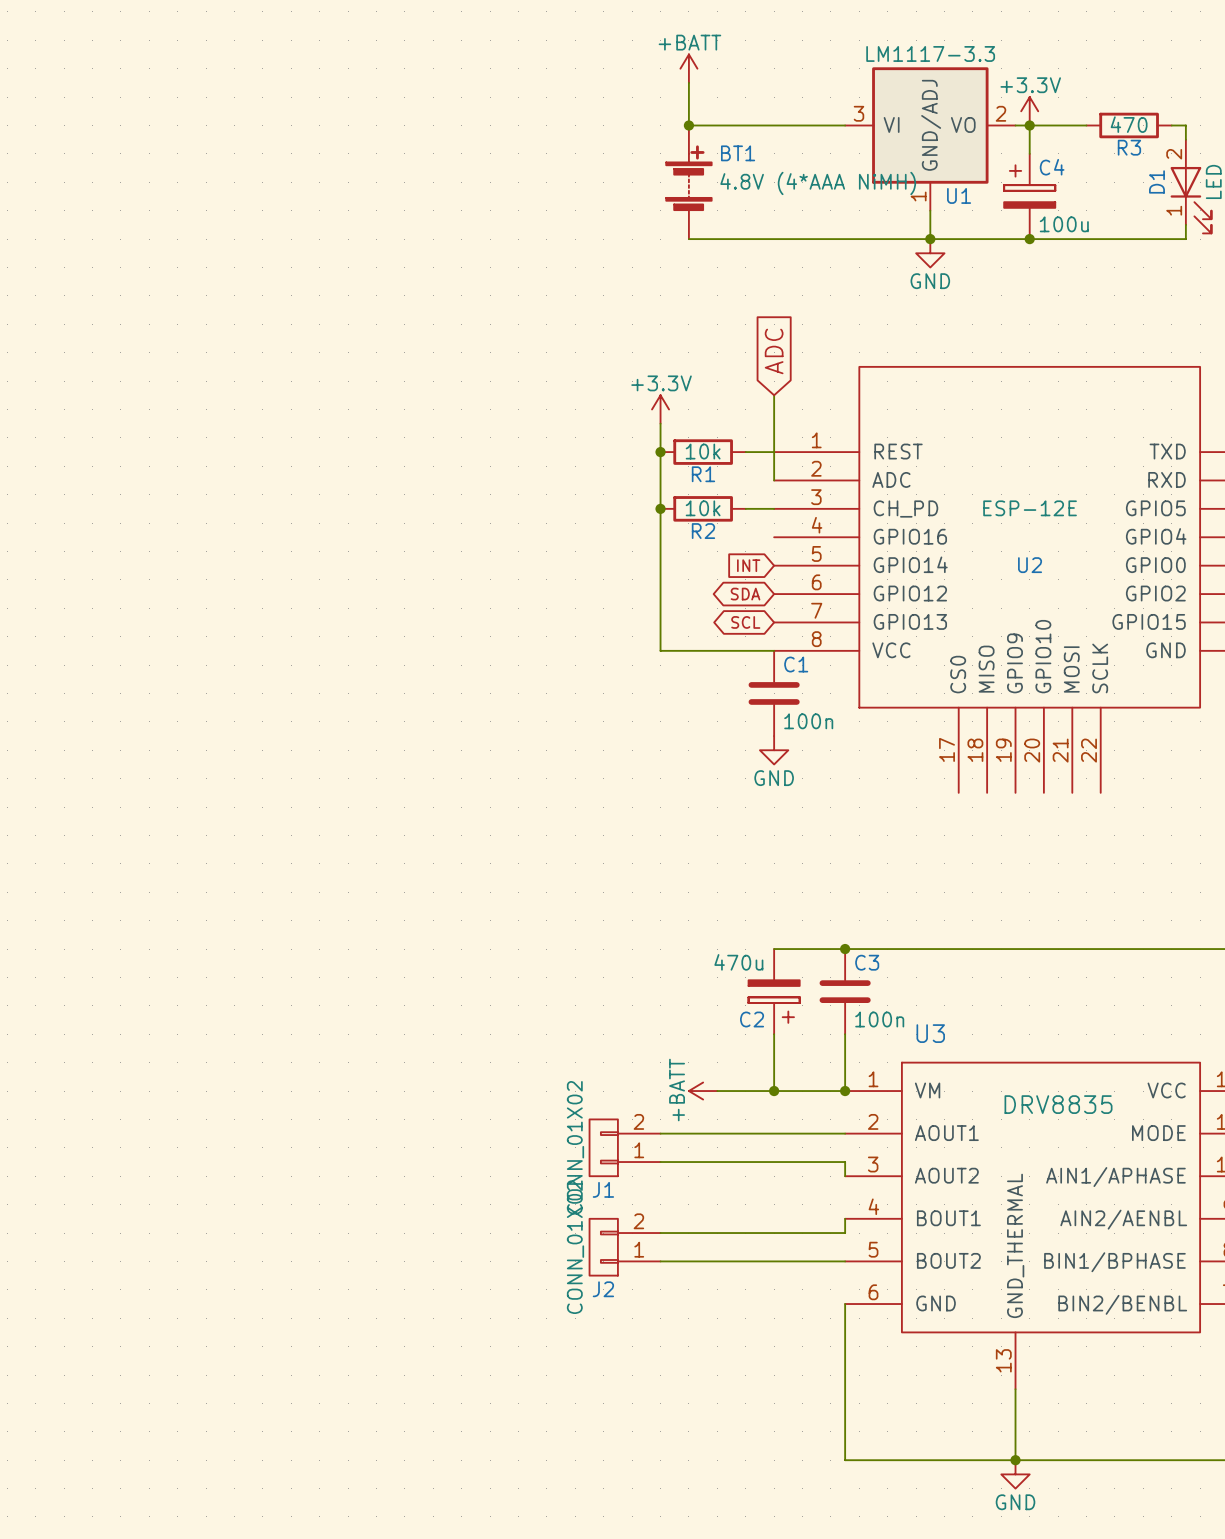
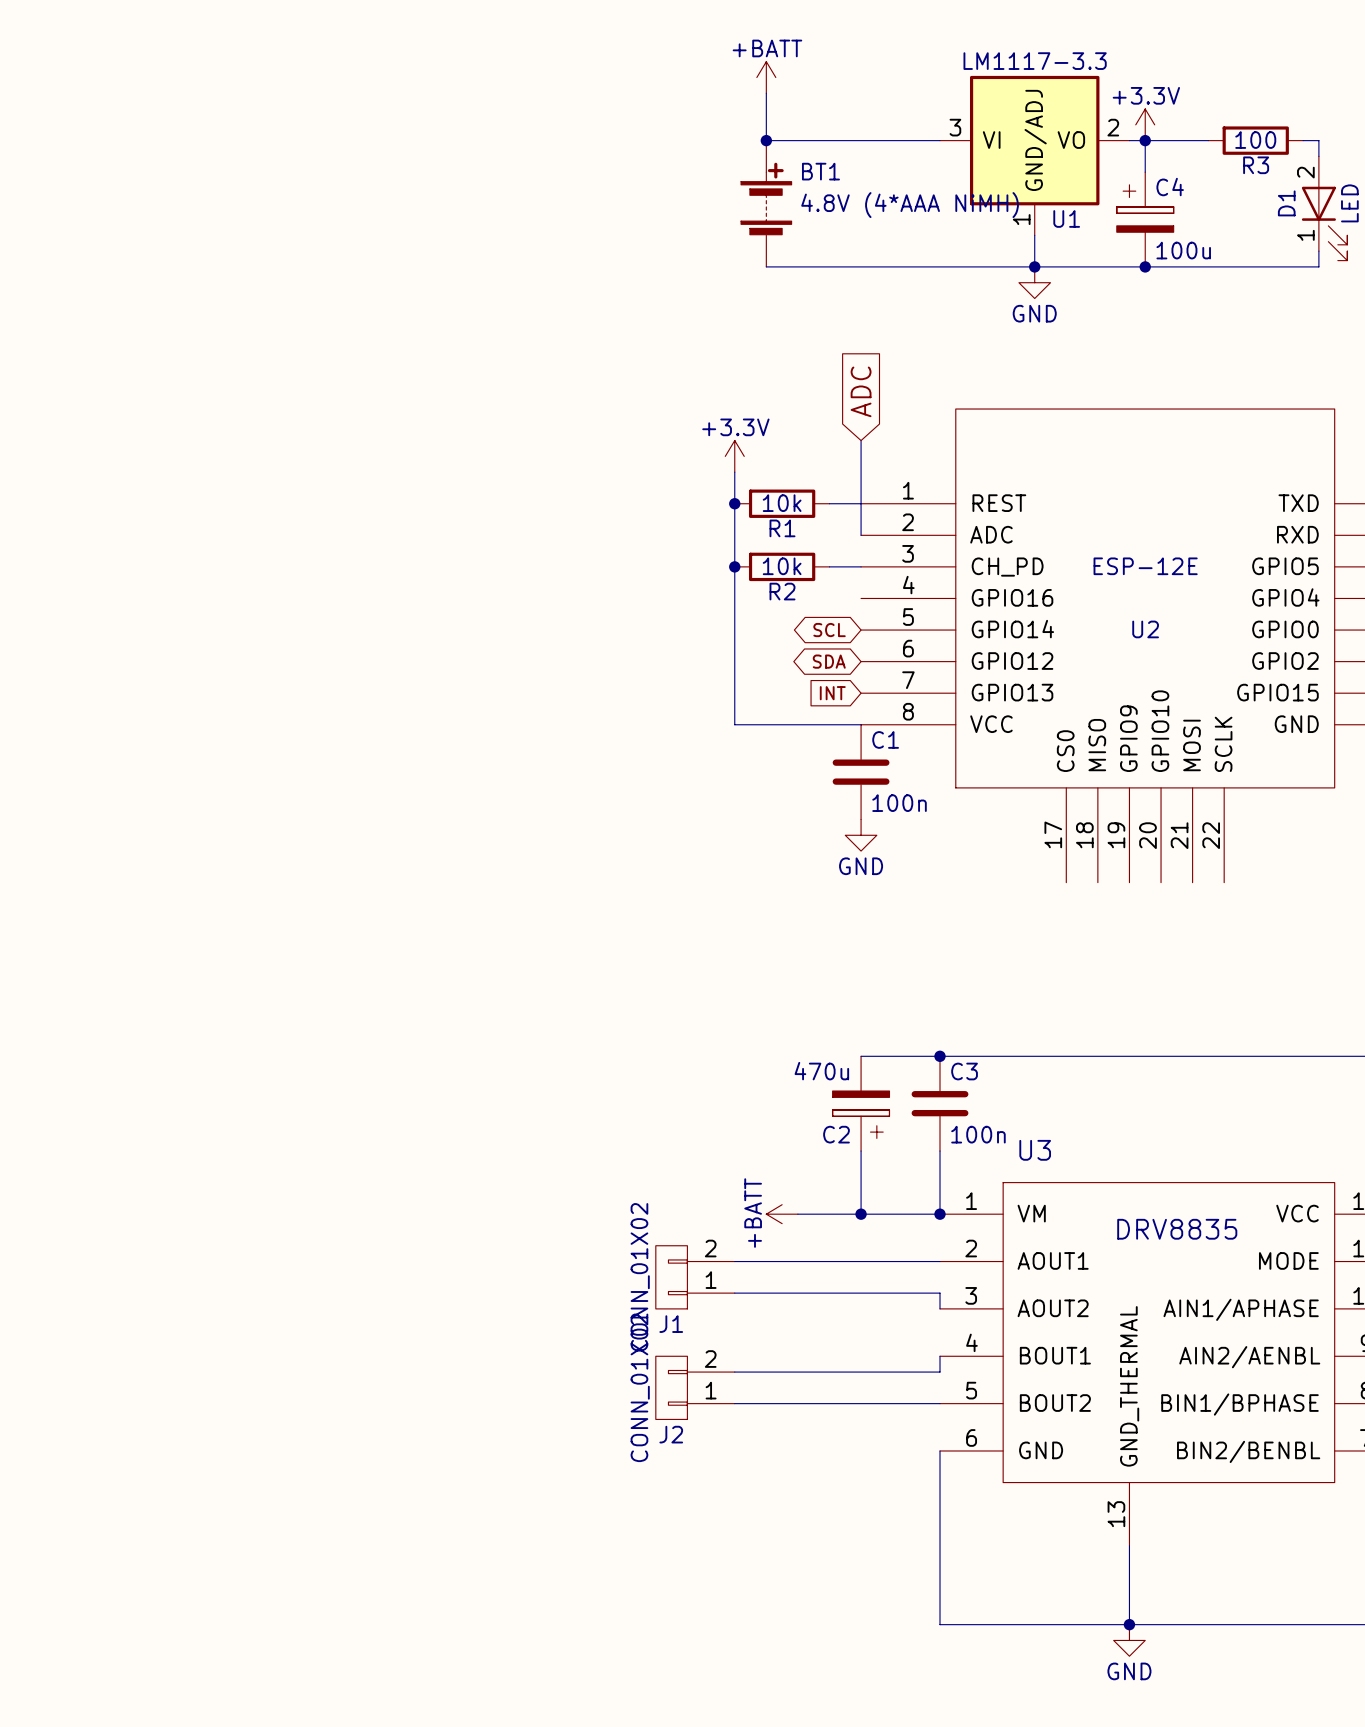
R3 value: 470 (1129, 124) -> 100 (1255, 140)
global label shape: input (748, 565) -> bidirectional (829, 630)
global label: INT (748, 565) -> SCL (829, 630)
global label shape: bidirectional (745, 622) -> input (832, 693)
global label: SCL (745, 622) -> INT (832, 693)

